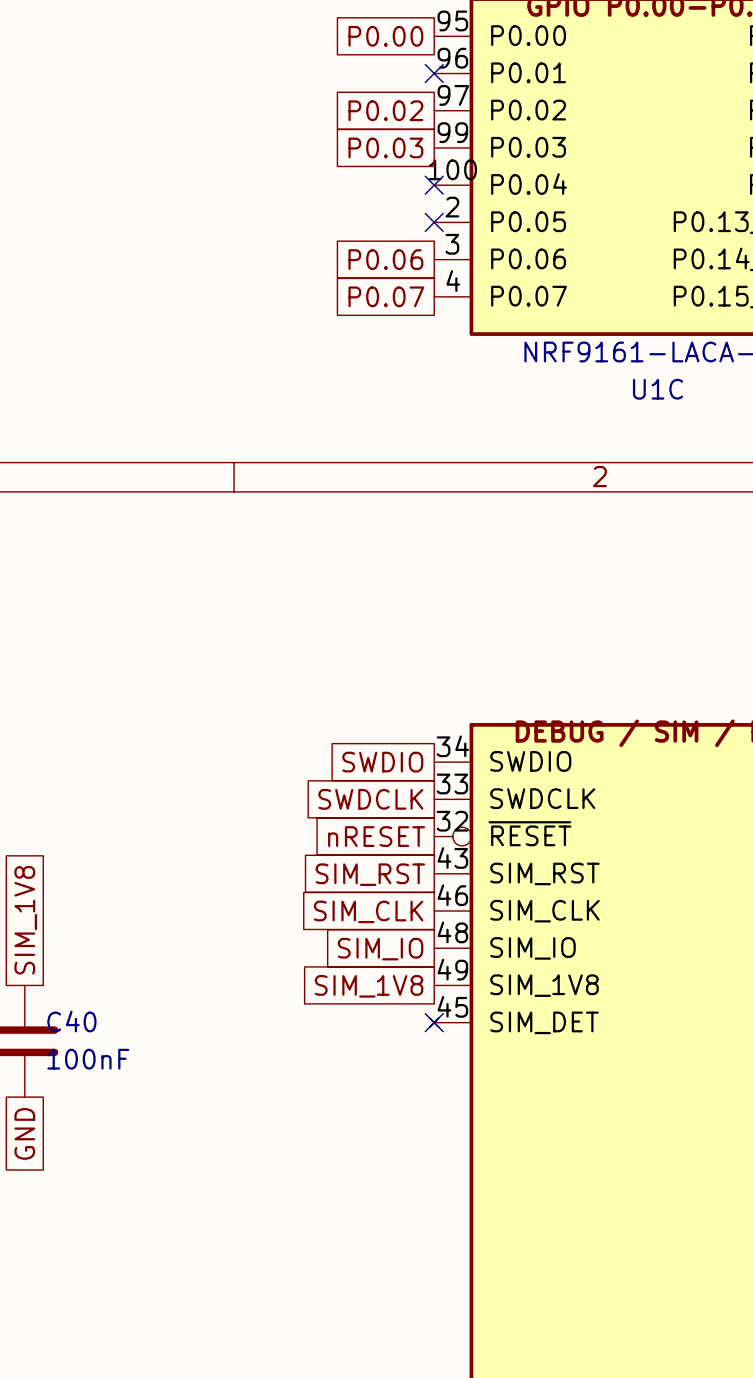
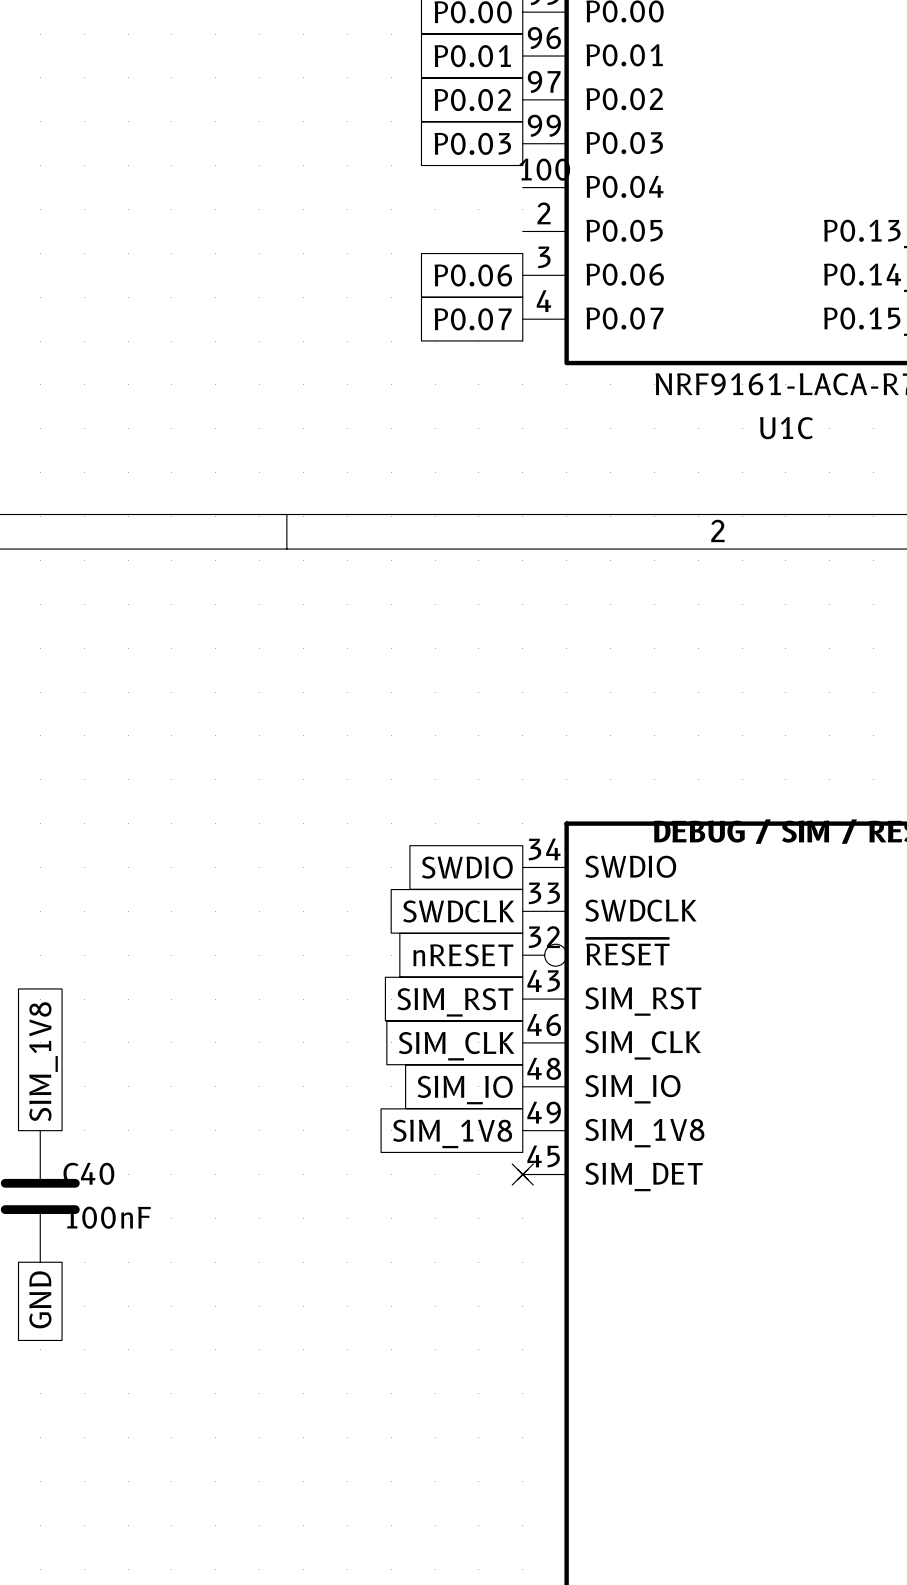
global label: none -> P0.01 (472, 56)
no-connect mark: (434, 73) -> none
no-connect mark: (434, 185) -> none
no-connect mark: (434, 222) -> none

